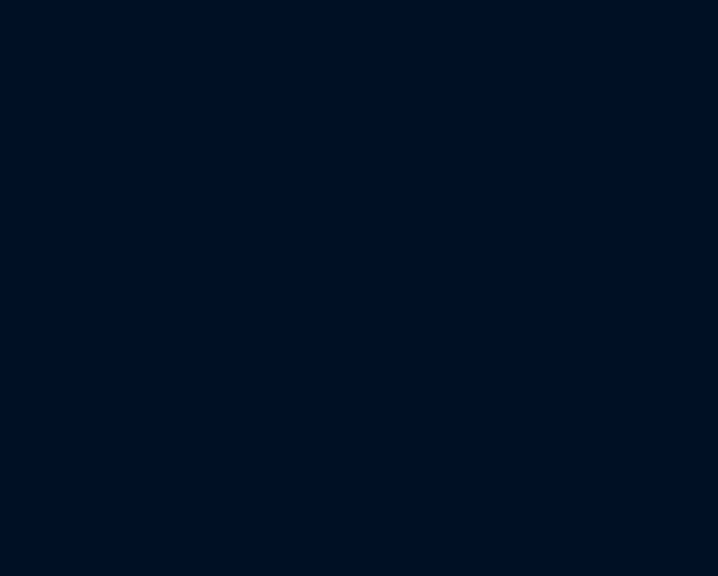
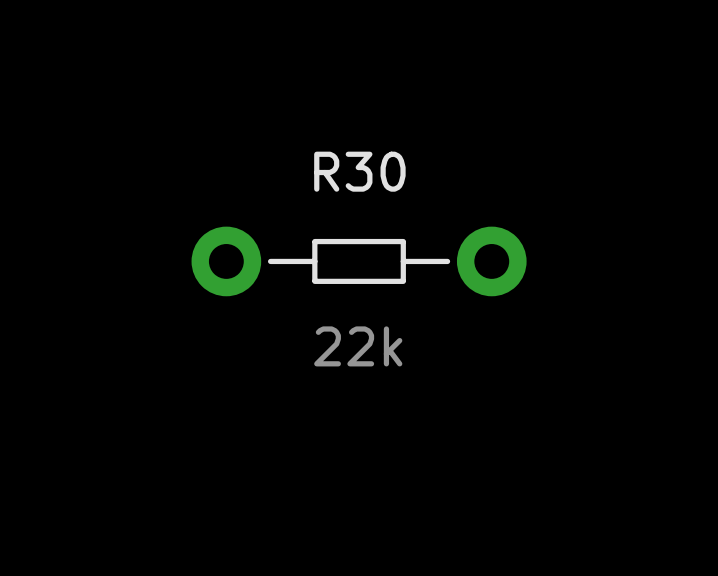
R30: none -> 22k (359, 261)

